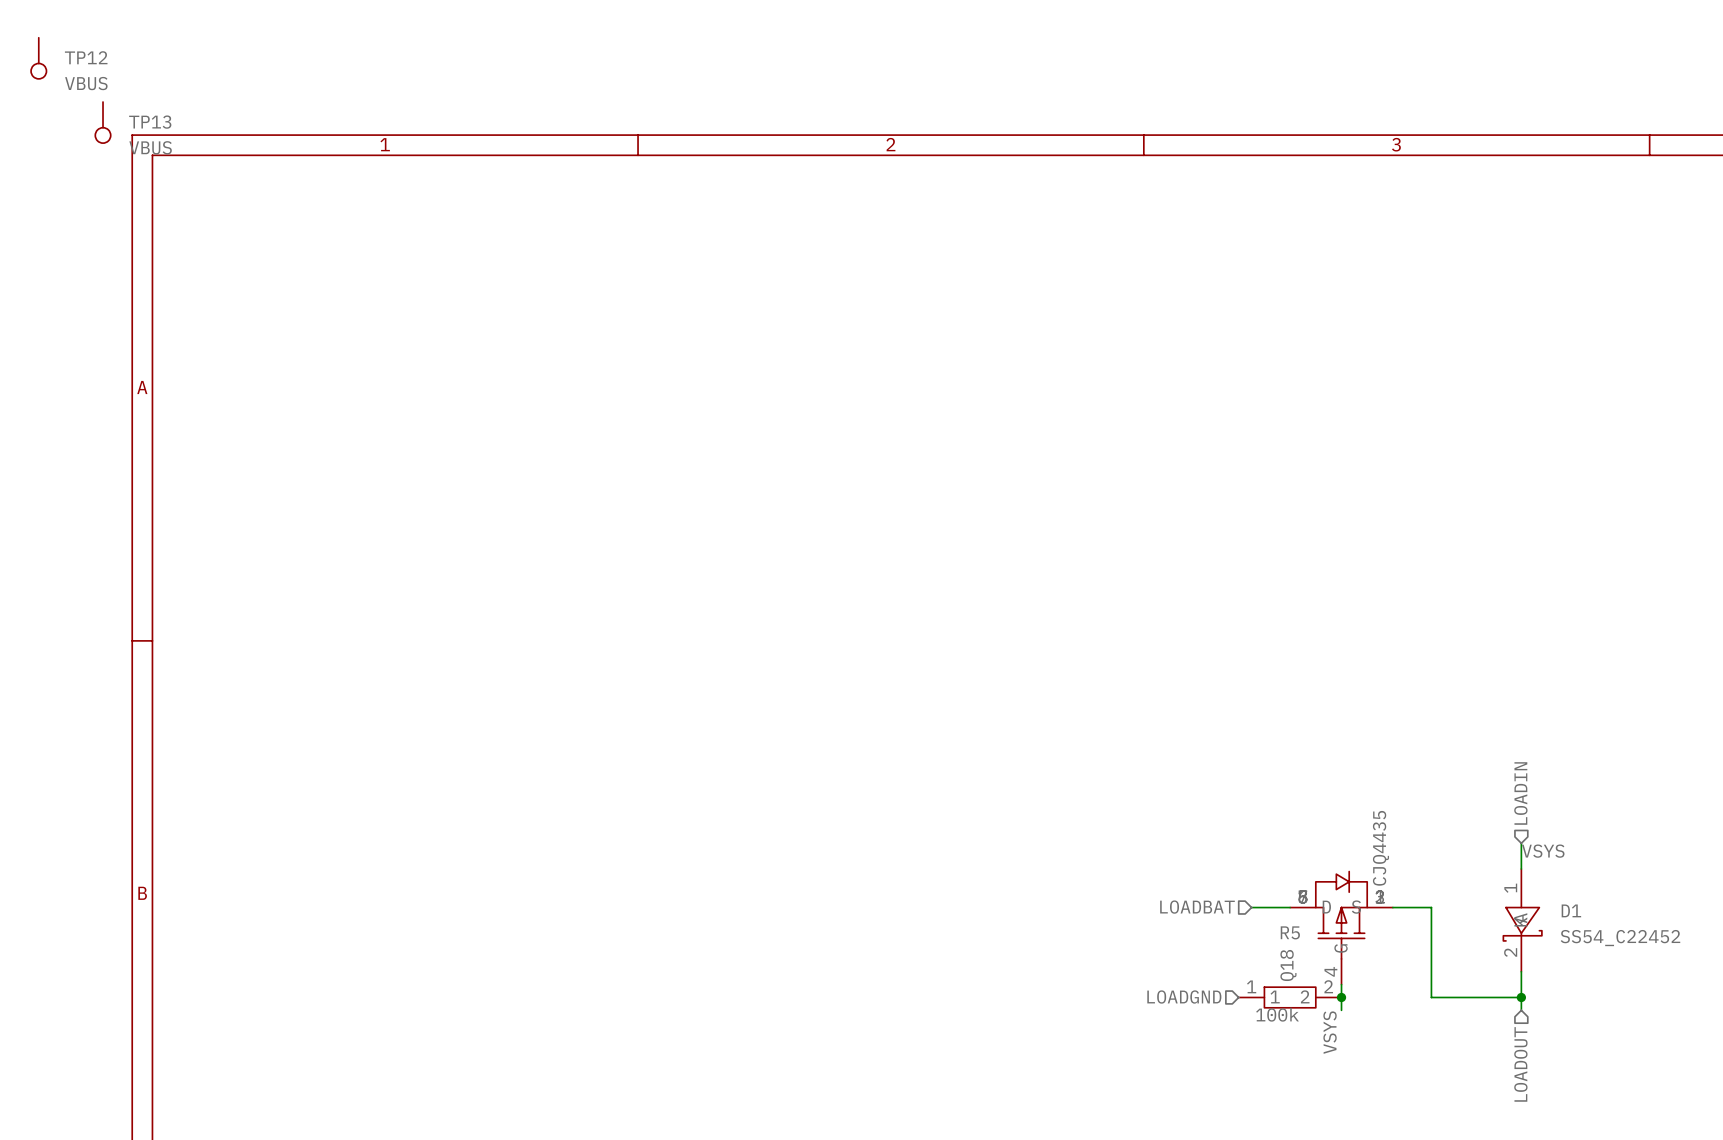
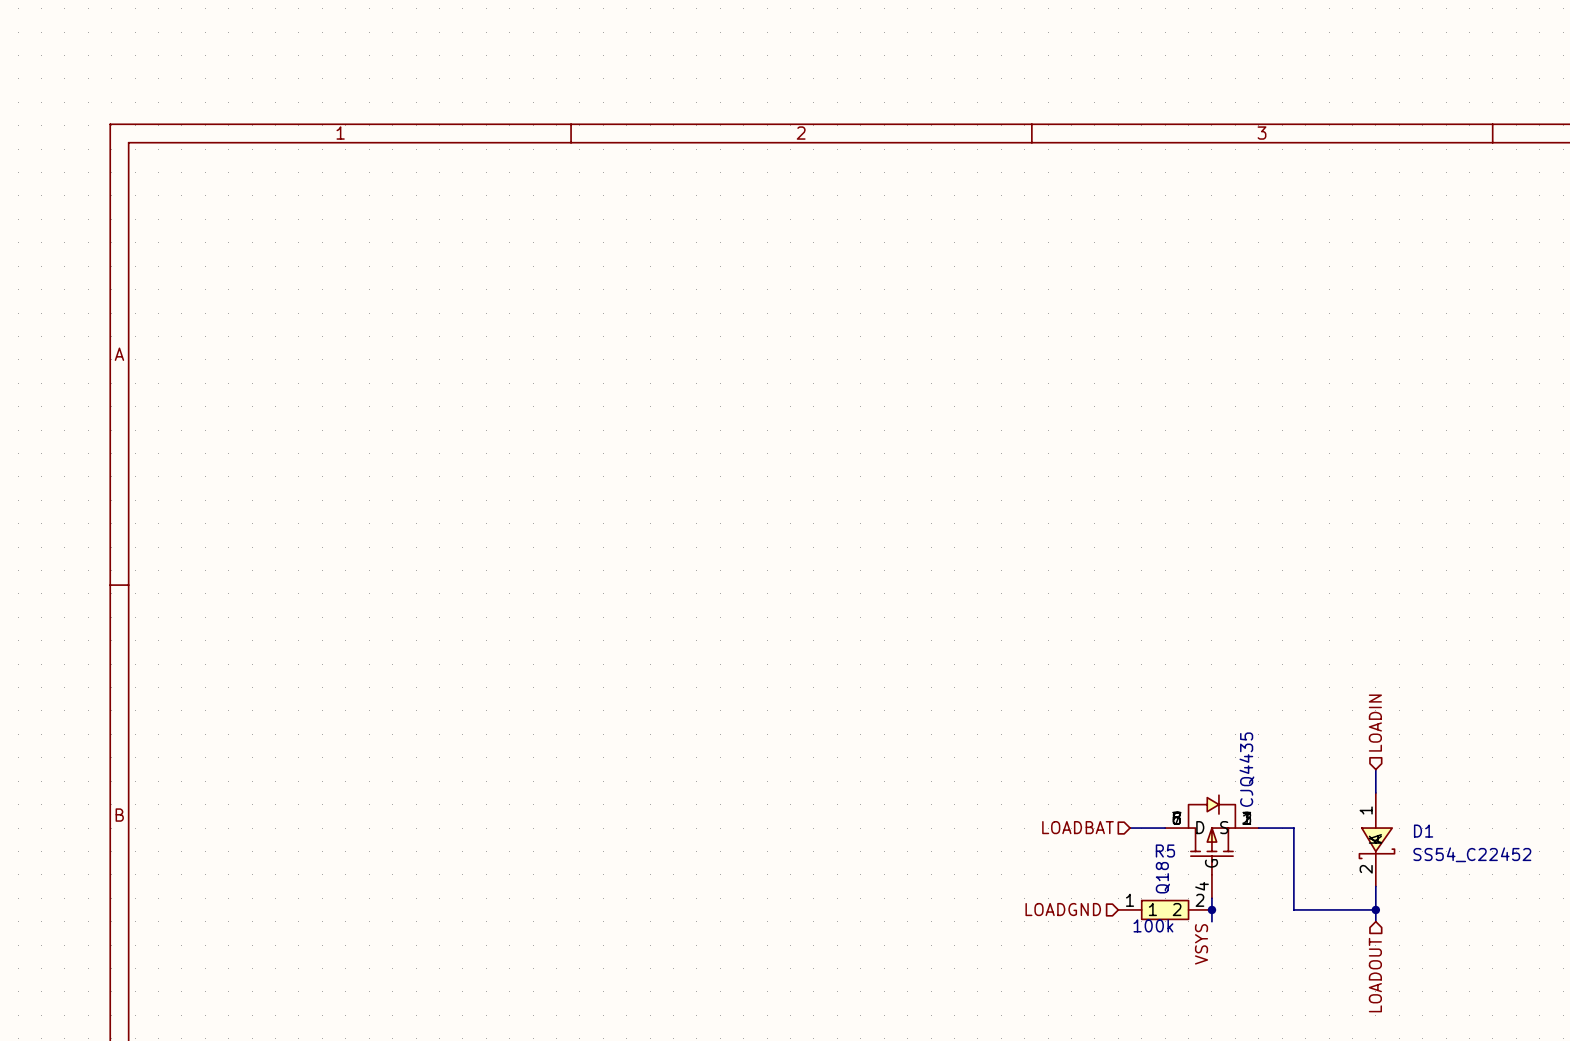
TP12: VBUS (38, 58) -> none
TP13: VBUS (103, 122) -> none
label: VSYS (1543, 851) -> none

